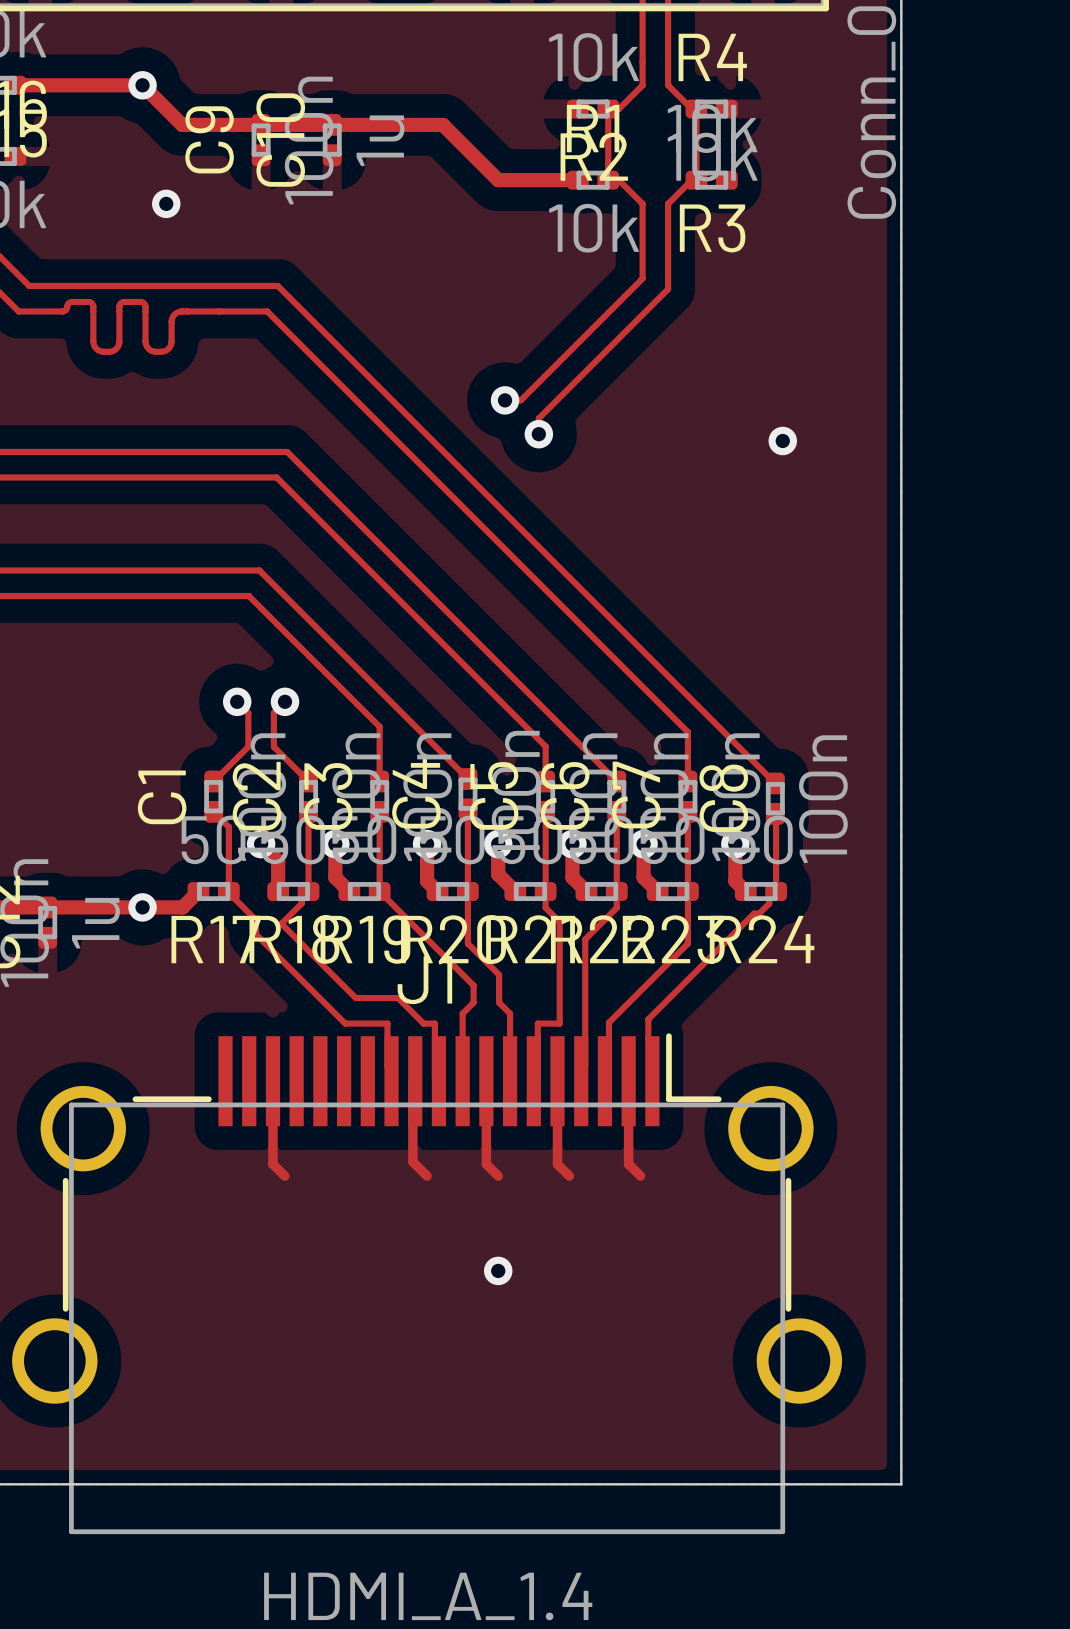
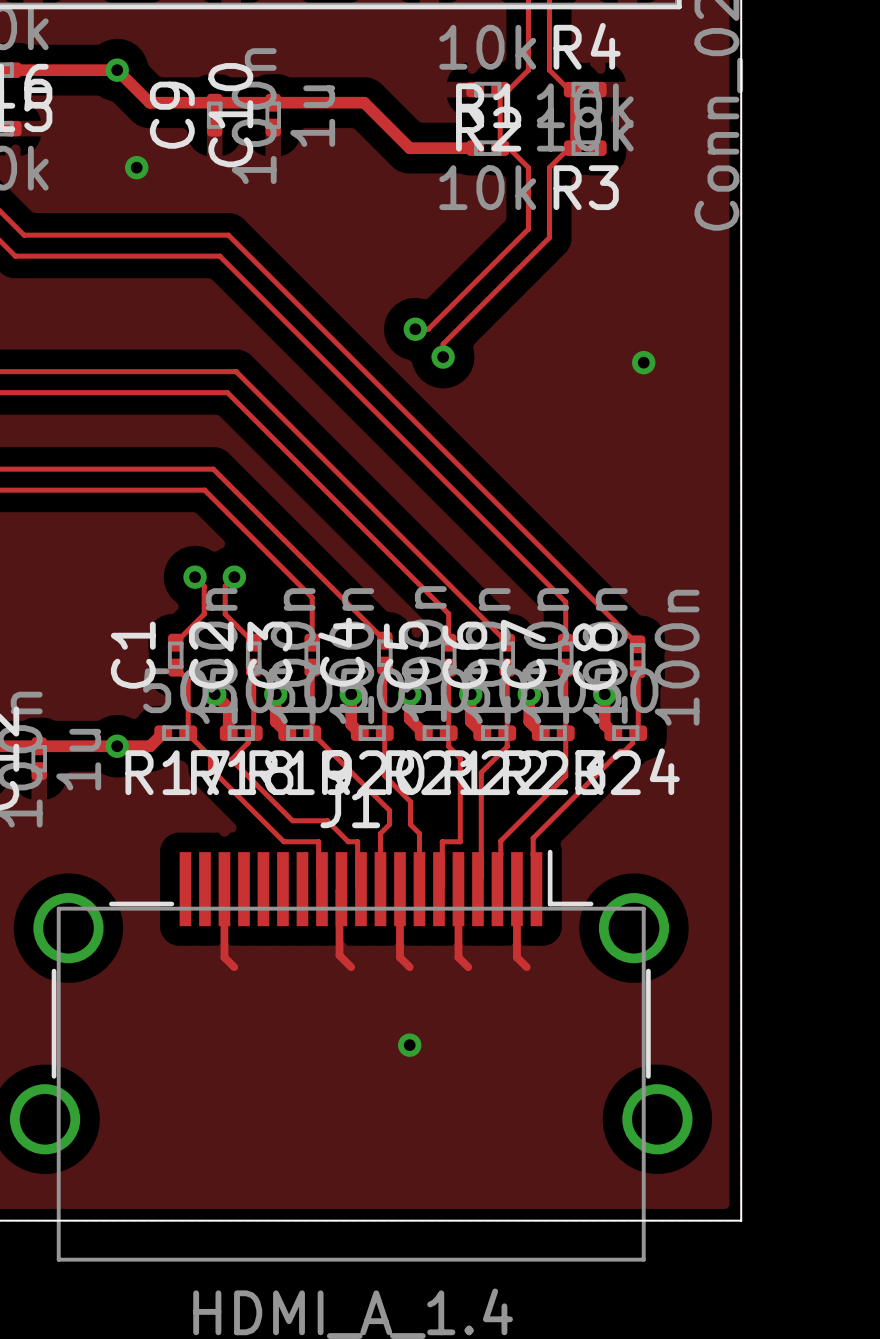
track: (62, 311) (65, 310) (70, 302) (91, 303) (93, 344) (97, 349) (103, 351) (112, 351) (118, 345) (119, 306) (122, 302) (141, 302) (144, 304) (145, 344) (149, 349) (154, 351) (163, 351) (169, 347) (171, 342) (172, 317) (175, 313) (182, 311) -> (51, 256) (149, 256)

